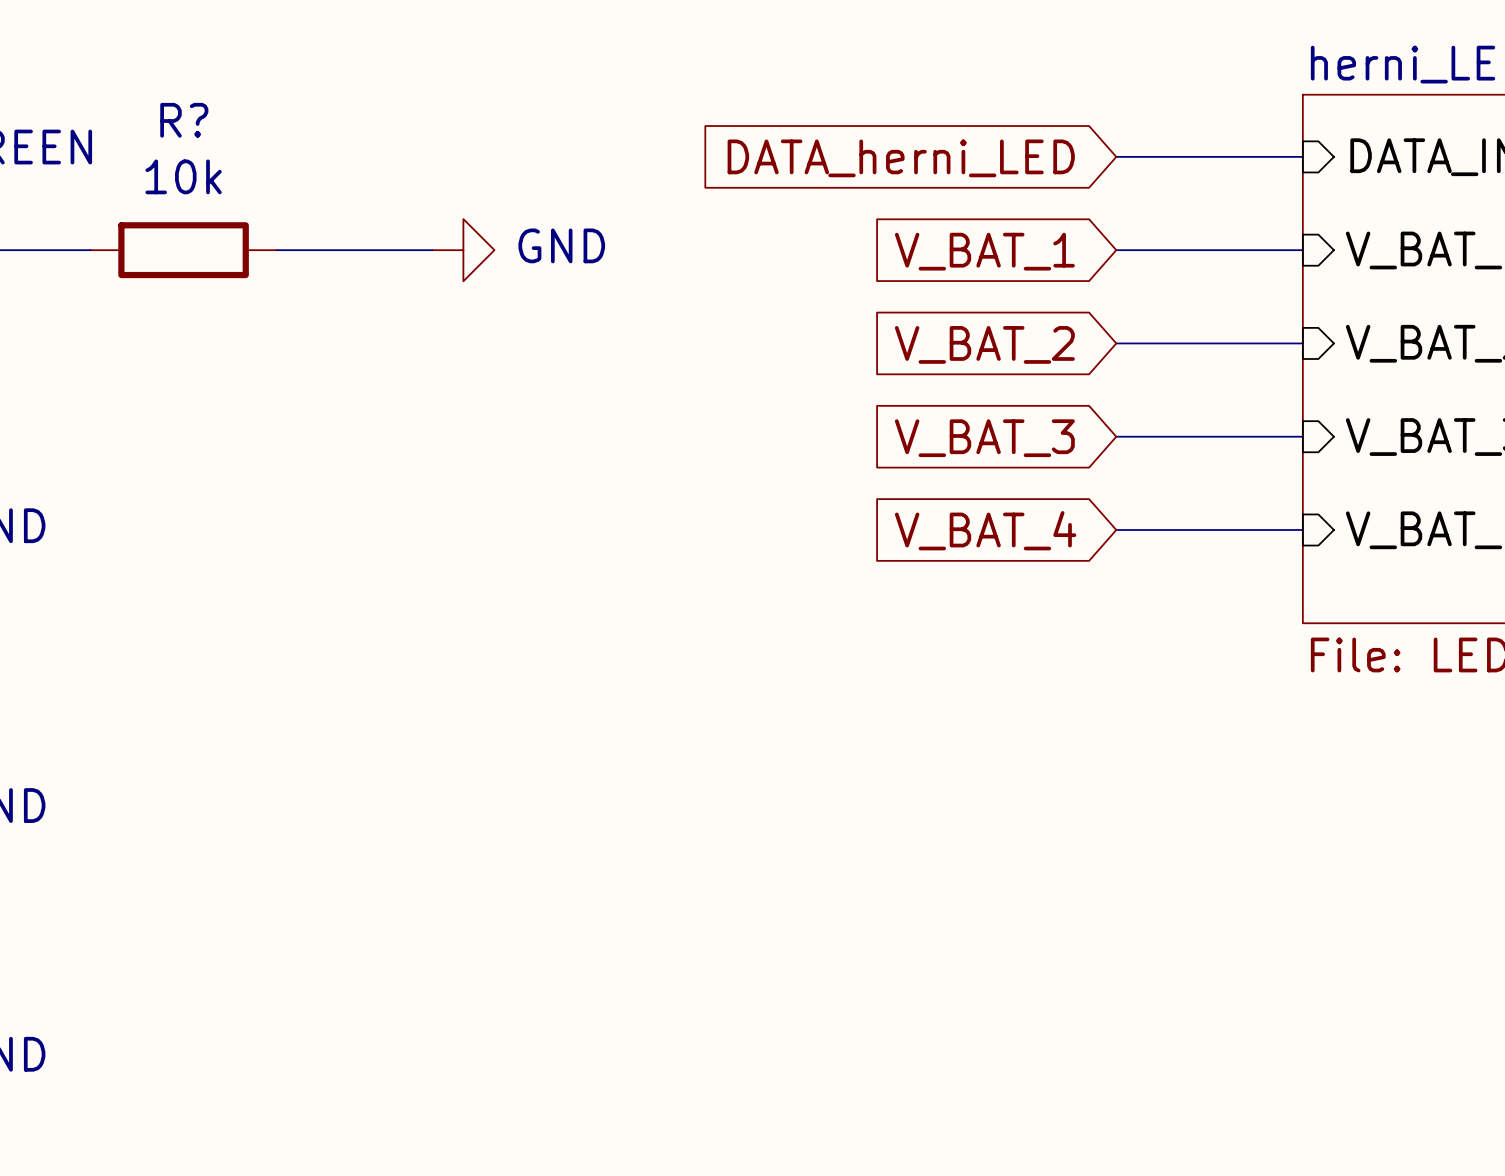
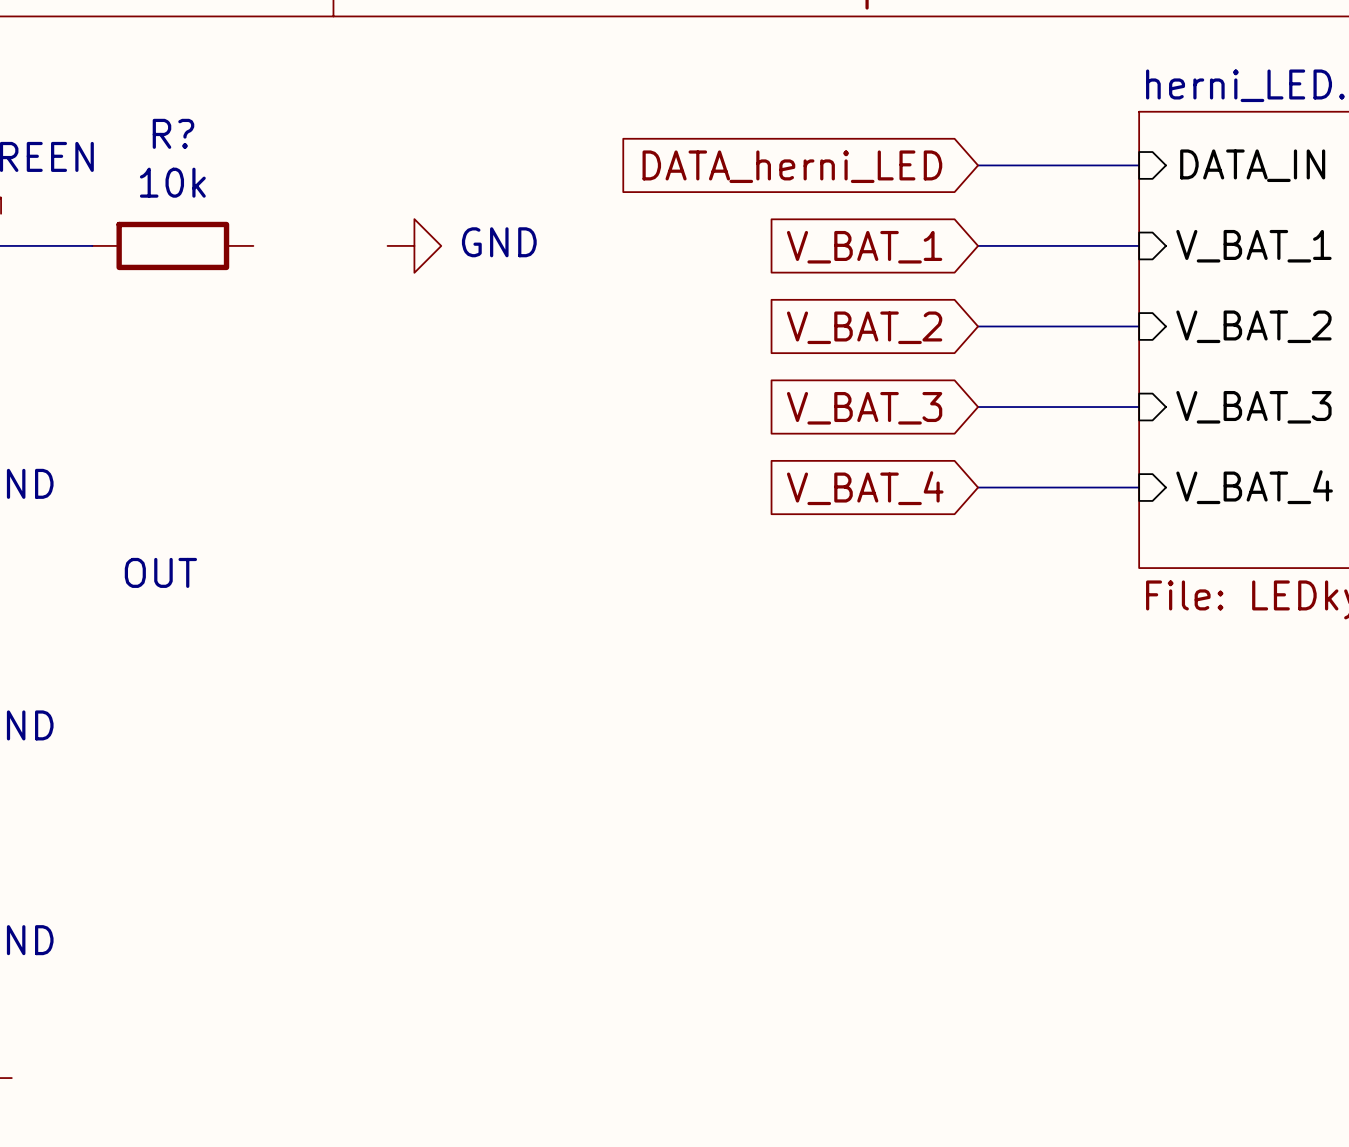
wire: (276, 250) (432, 250) -> none
text: none -> OUT (160, 572)

